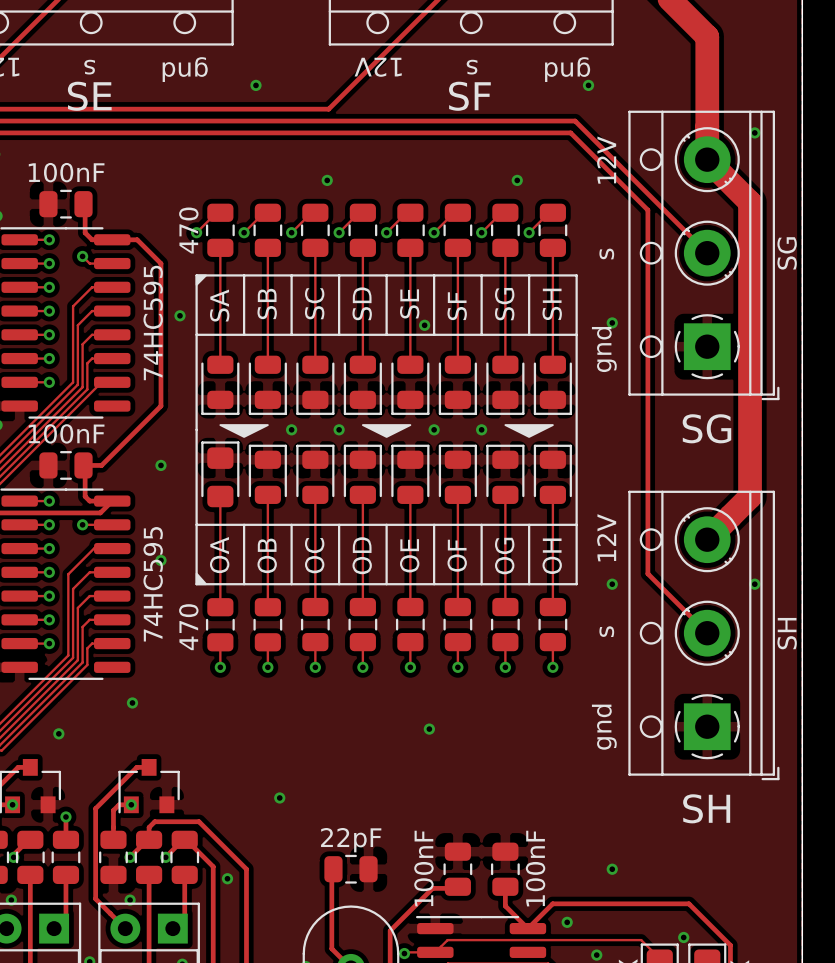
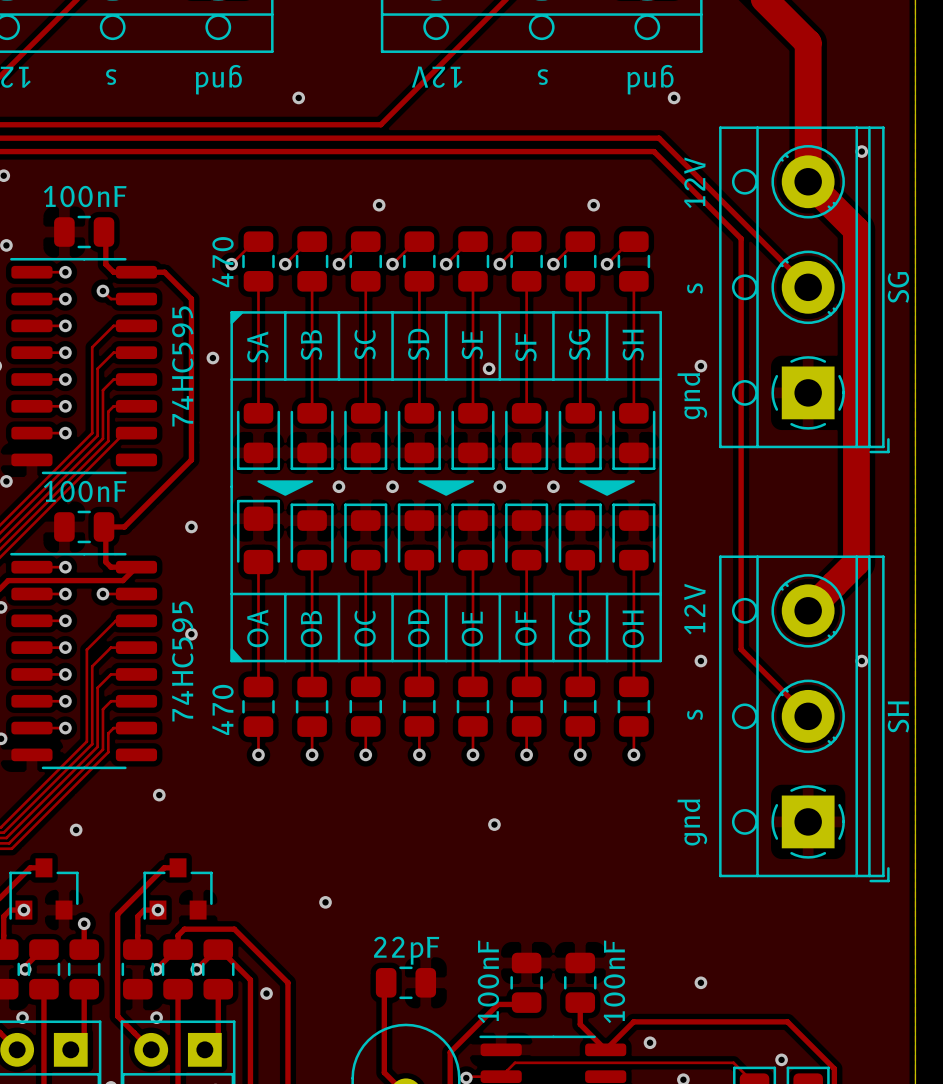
text: SE (89, 96) -> none
text: SF (469, 96) -> none
text: SG (706, 428) -> none
text: SH (706, 808) -> none

